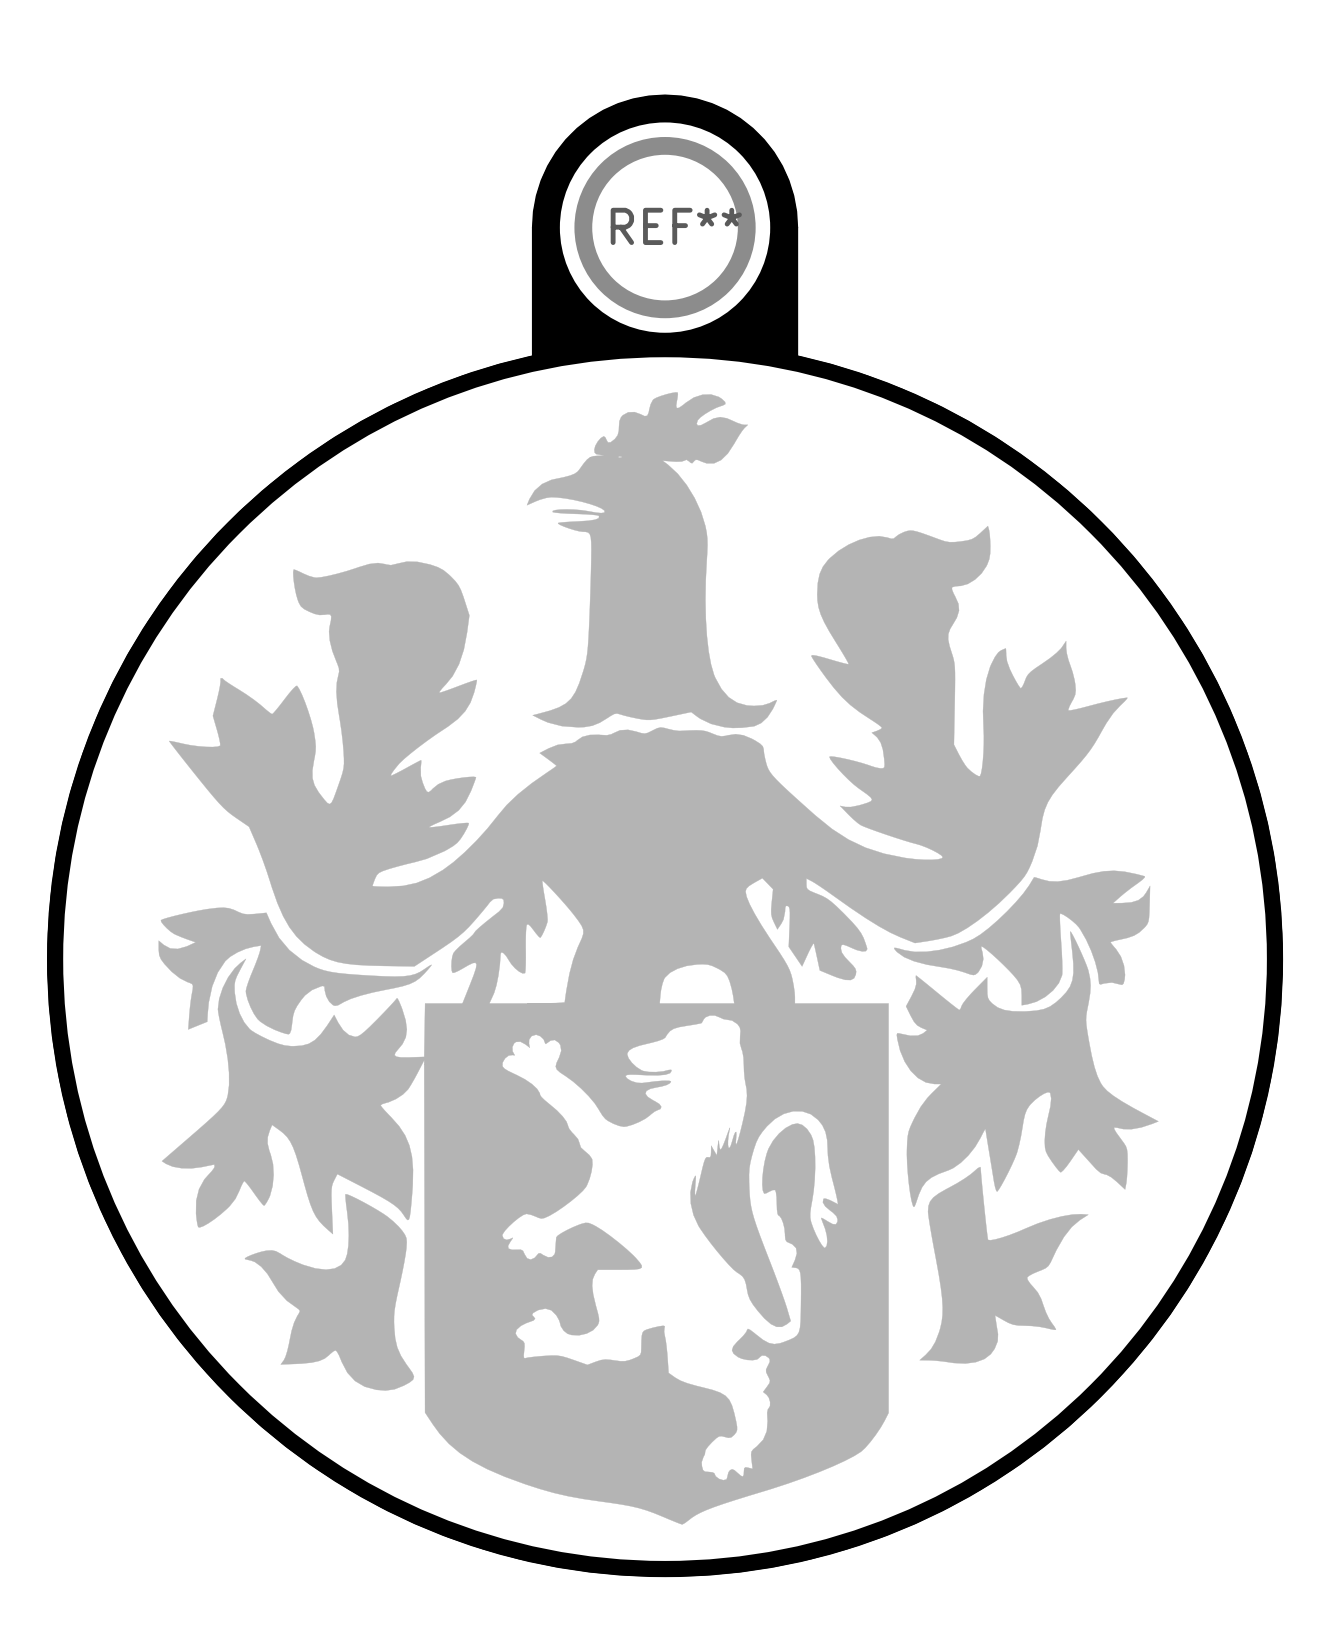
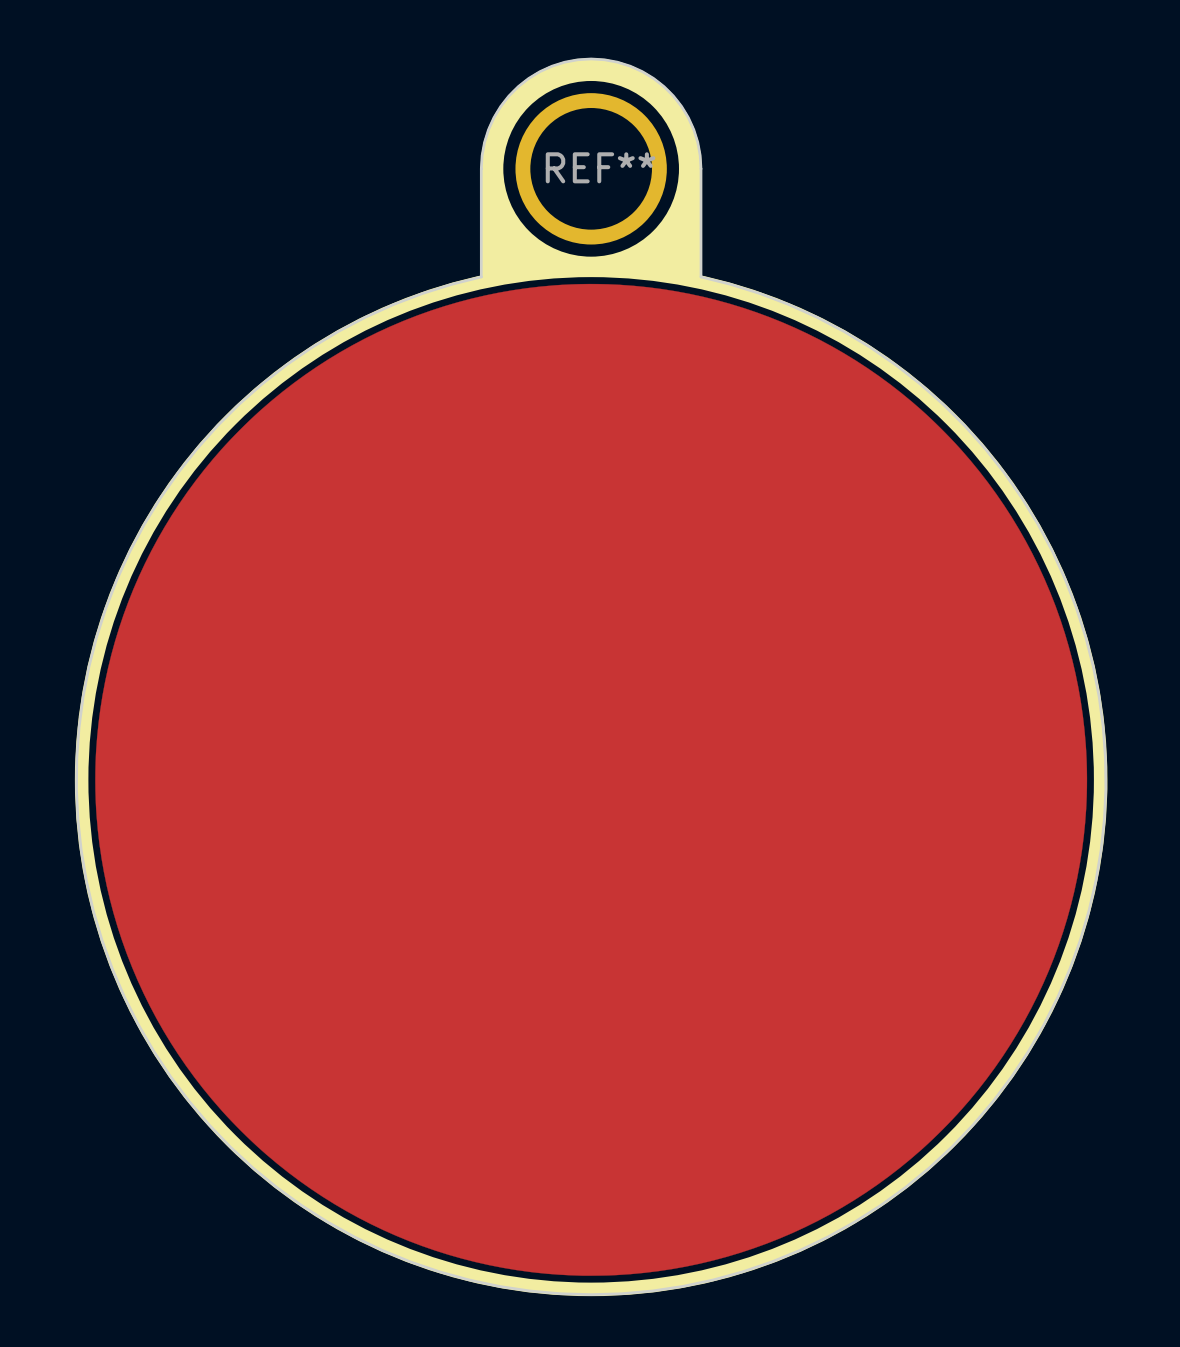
drawing shape: [158, 392, 1159, 1525] -> [95, 283, 1088, 1276]

